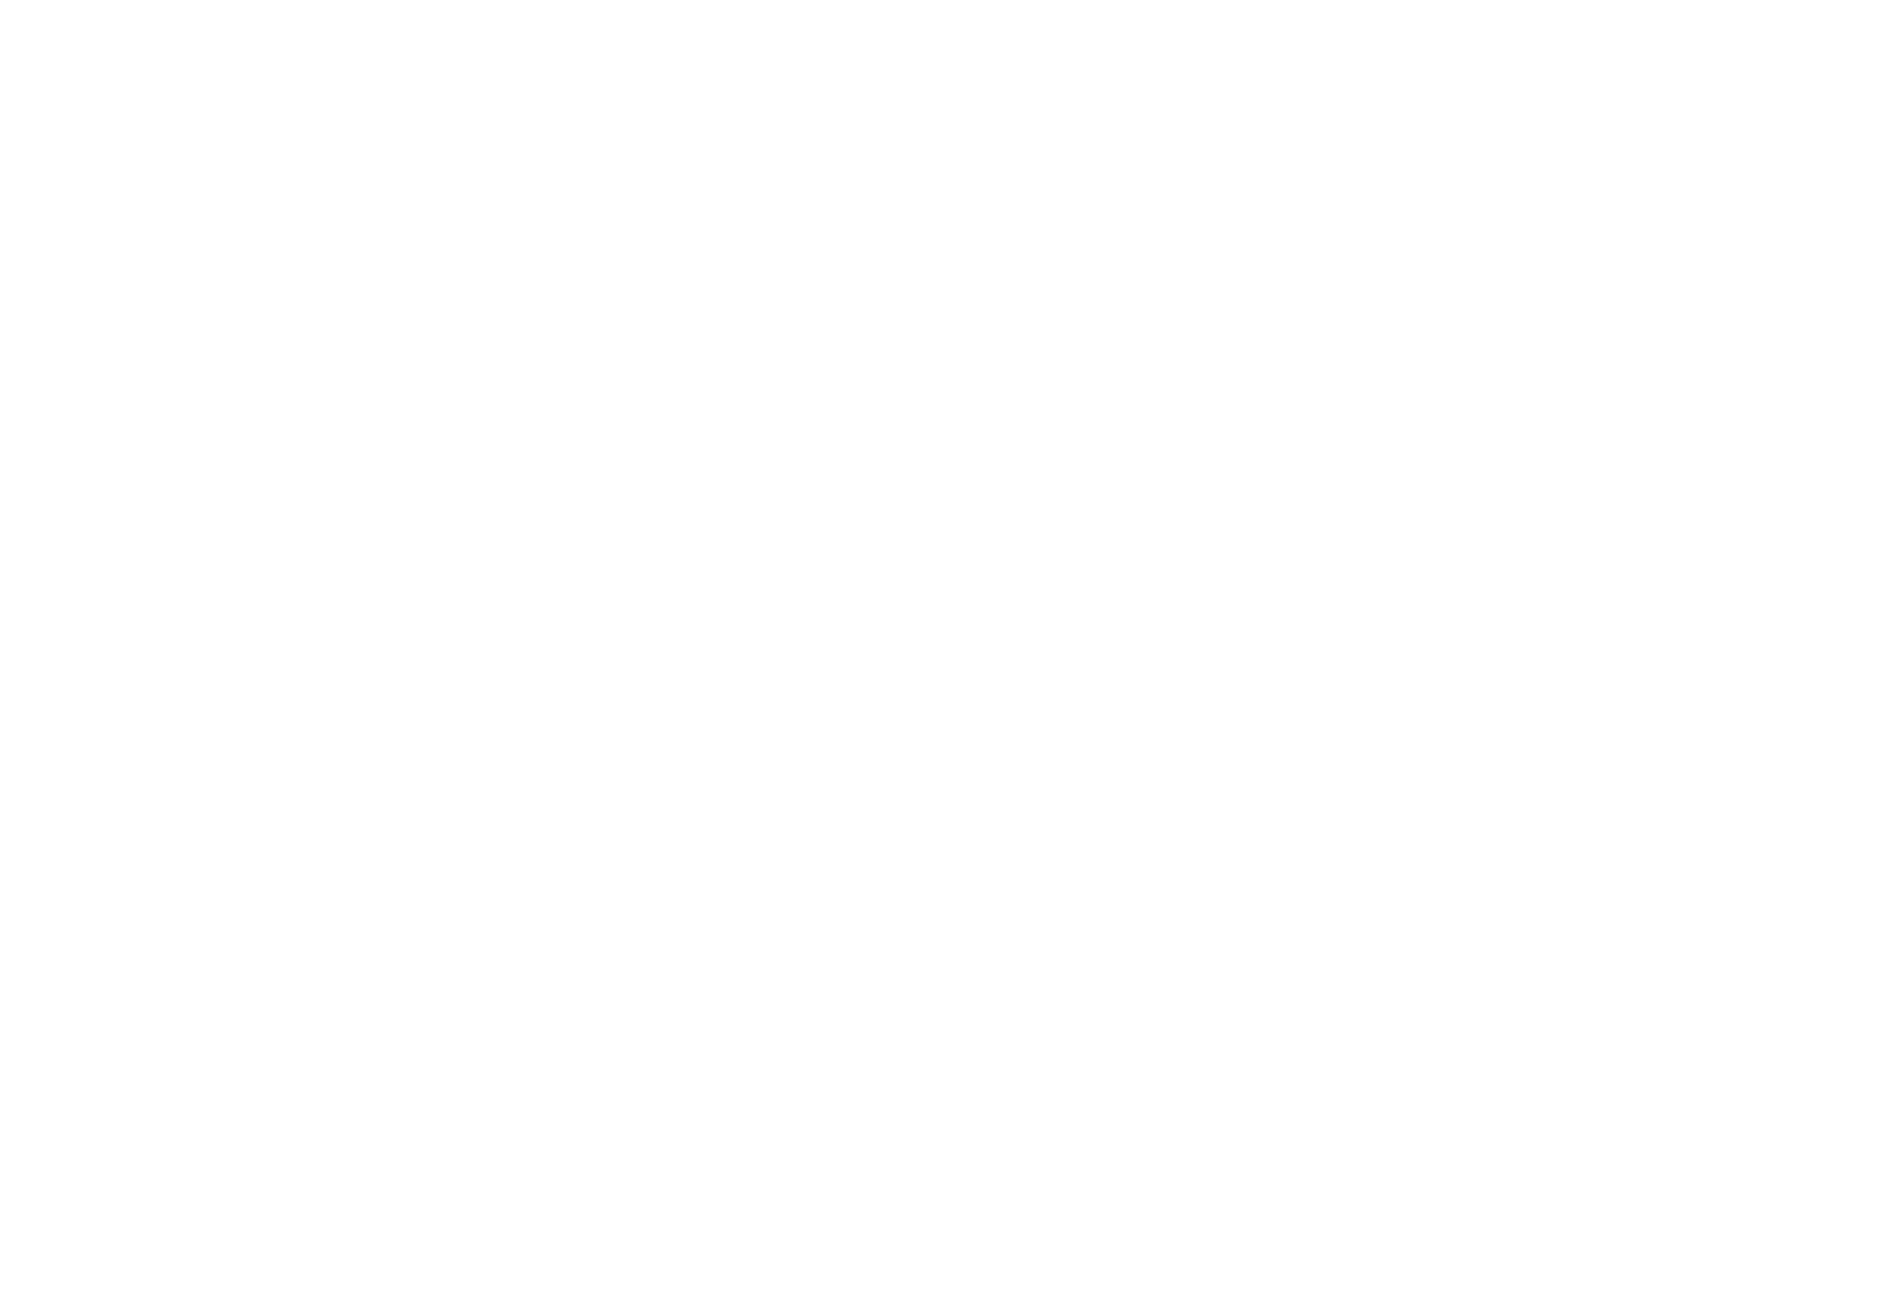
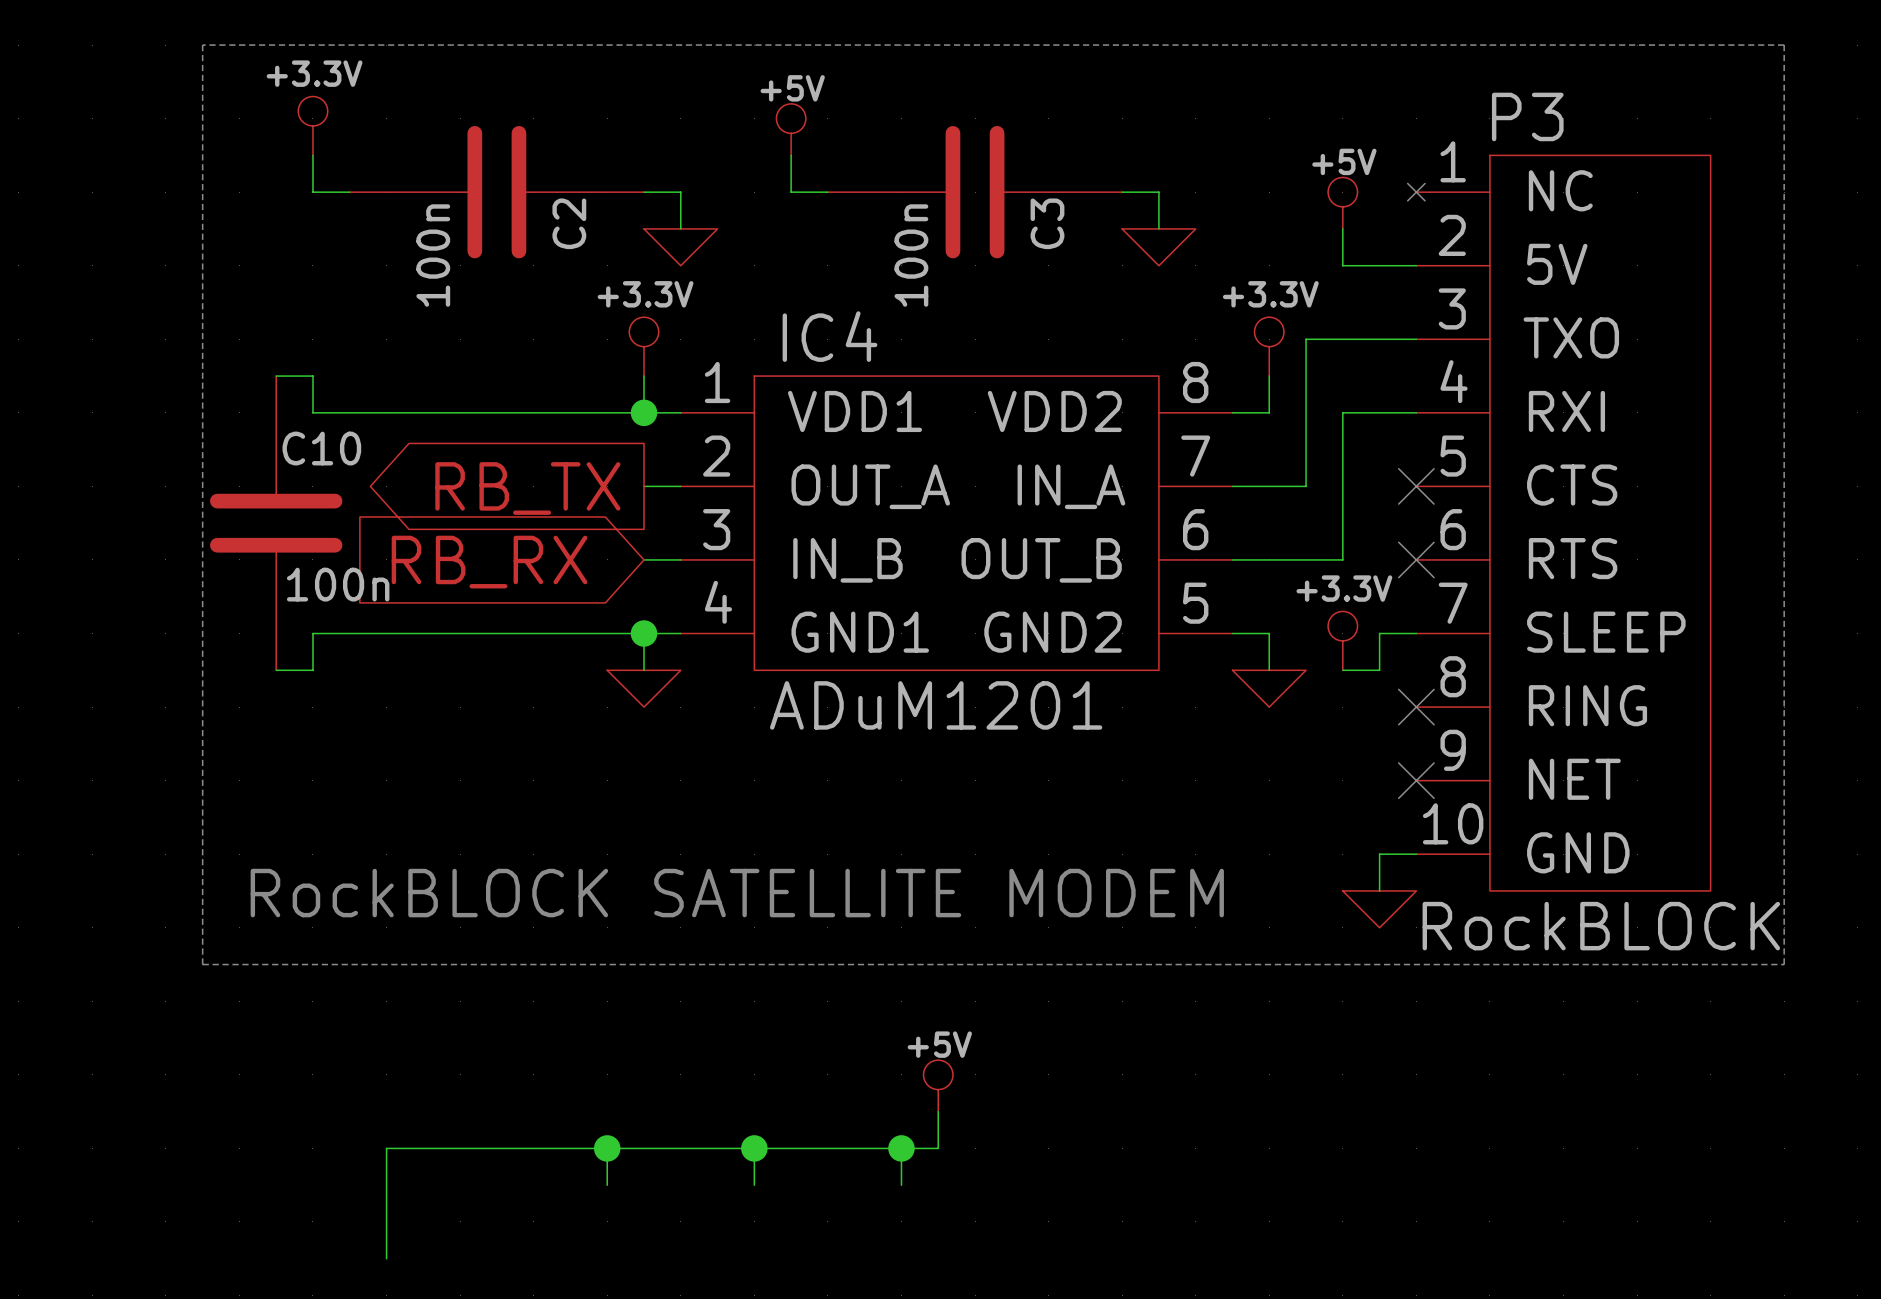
line: none -> (202, 45) (1784, 45) (1784, 964) (202, 964) (202, 45)
power symbol: none -> +3.3V (312, 125)
power symbol: none -> +5V (791, 129)
wire: none -> (312, 155) (312, 192) (349, 192)
wire: none -> (791, 155) (791, 192) (827, 192)
C2: none -> 100n (496, 192)
wire: none -> (644, 192) (680, 192) (680, 228)
C3: none -> 100n (975, 192)
wire: none -> (1122, 192) (1158, 192) (1158, 228)
power symbol: none -> +5V (1342, 203)
wire: none -> (1342, 228) (1342, 265) (1416, 265)
power symbol: none -> (680, 247)
power symbol: none -> (1158, 247)
wire: none -> (1416, 339) (1306, 339) (1306, 486) (1232, 486)
power symbol: none -> +3.3V (644, 346)
power symbol: none -> +3.3V (1269, 346)
wire: none -> (276, 376) (312, 376) (312, 412) (680, 412)
wire: none -> (644, 376) (644, 412)
wire: none -> (1269, 376) (1269, 412) (1232, 412)
junction: none -> (644, 412)
wire: none -> (1416, 412) (1342, 412) (1342, 559) (1232, 559)
wire: none -> (644, 486) (680, 486)
no-connect mark: none -> (1416, 486)
global label: none -> RB_TX (527, 488)
C10: none -> 100n (276, 523)
IC4: none -> ADuM1201 (956, 523)
P3: none -> RockBLOCK (1559, 523)
wire: none -> (644, 559) (680, 559)
no-connect mark: none -> (1416, 559)
global label: none -> RB_RX (489, 562)
wire: none -> (644, 633) (644, 670)
junction: none -> (644, 633)
wire: none -> (680, 633) (312, 633) (312, 670) (276, 670)
wire: none -> (1232, 633) (1269, 633) (1269, 670)
wire: none -> (1416, 633) (1379, 633) (1379, 670) (1342, 670)
power symbol: none -> +3.3V (1342, 640)
power symbol: none -> (644, 688)
power symbol: none -> (1269, 688)
no-connect mark: none -> (1416, 707)
no-connect mark: none -> (1416, 780)
wire: none -> (1416, 854) (1379, 854) (1379, 890)
text: none -> RockBLOCK SATELLITE MODEM (737, 893)
power symbol: none -> (1379, 909)
power symbol: none -> +5V (938, 1085)
wire: none -> (938, 1111) (938, 1148) (386, 1148) (386, 1258)
wire: none -> (607, 1148) (607, 1185)
junction: none -> (607, 1148)
wire: none -> (754, 1148) (754, 1185)
junction: none -> (754, 1148)
wire: none -> (901, 1148) (901, 1185)
junction: none -> (901, 1148)

